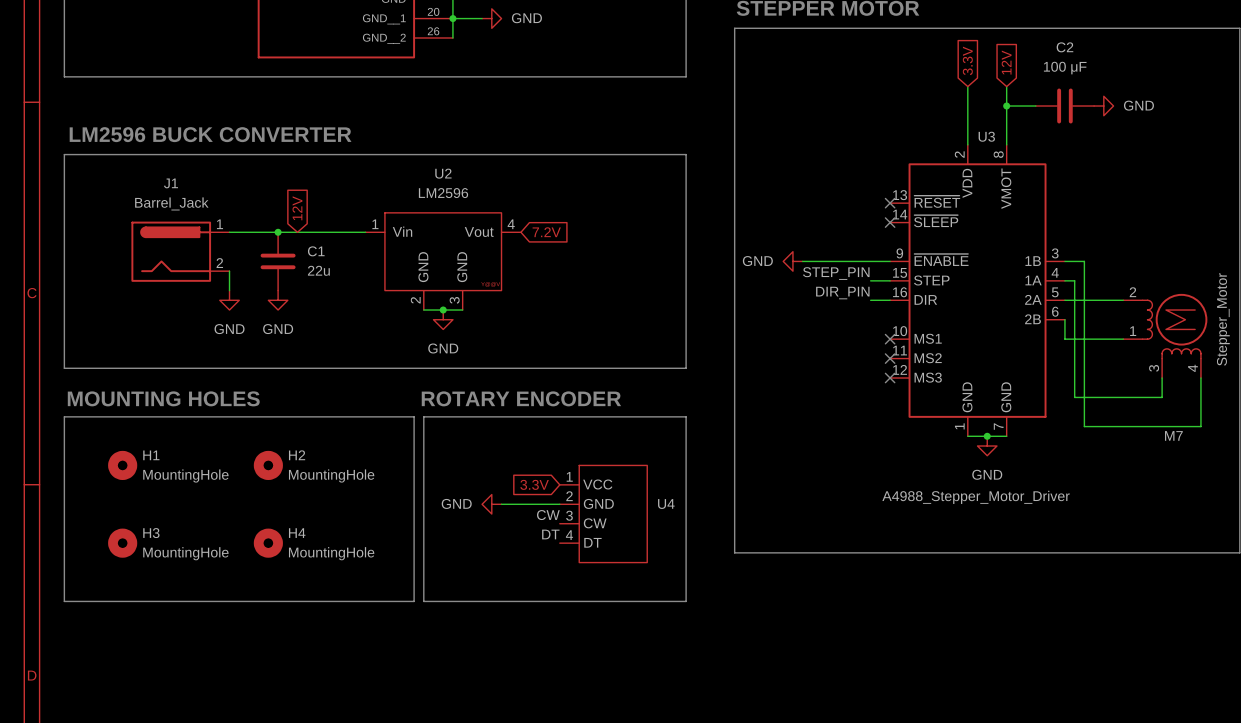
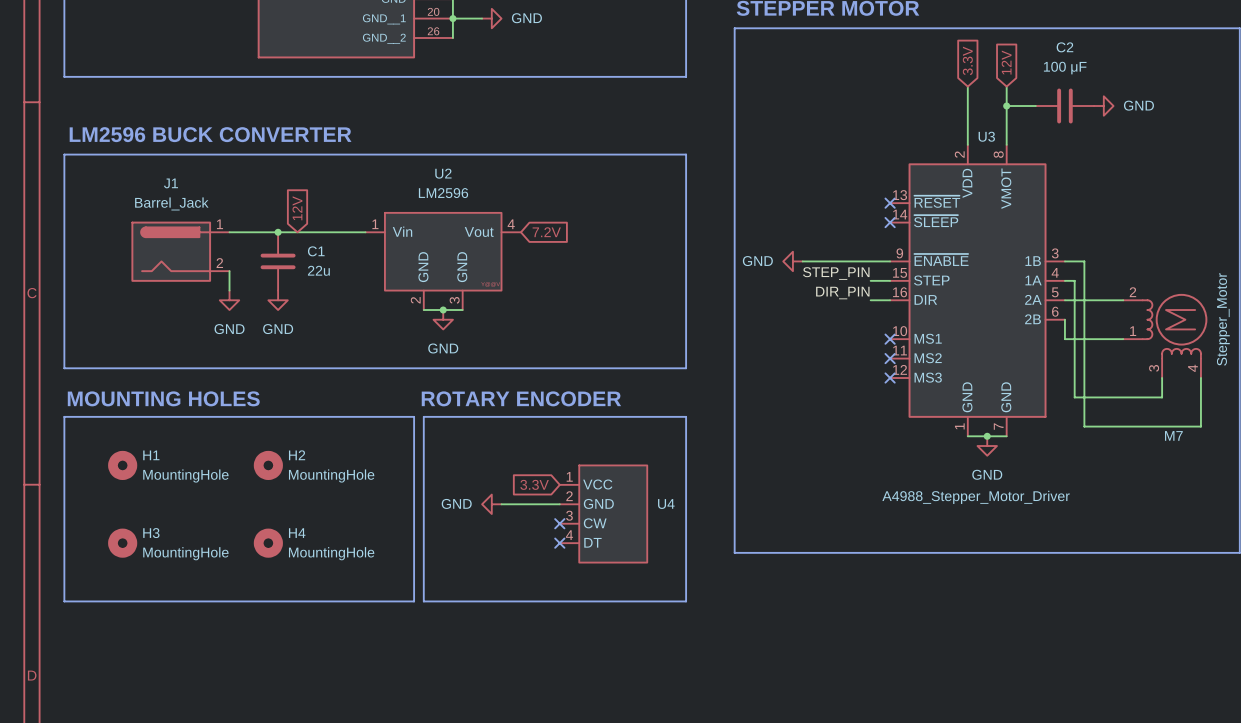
label: CW (548, 515) -> none
no-connect mark: none -> (559, 523)
label: DT (550, 534) -> none
no-connect mark: none -> (559, 543)

